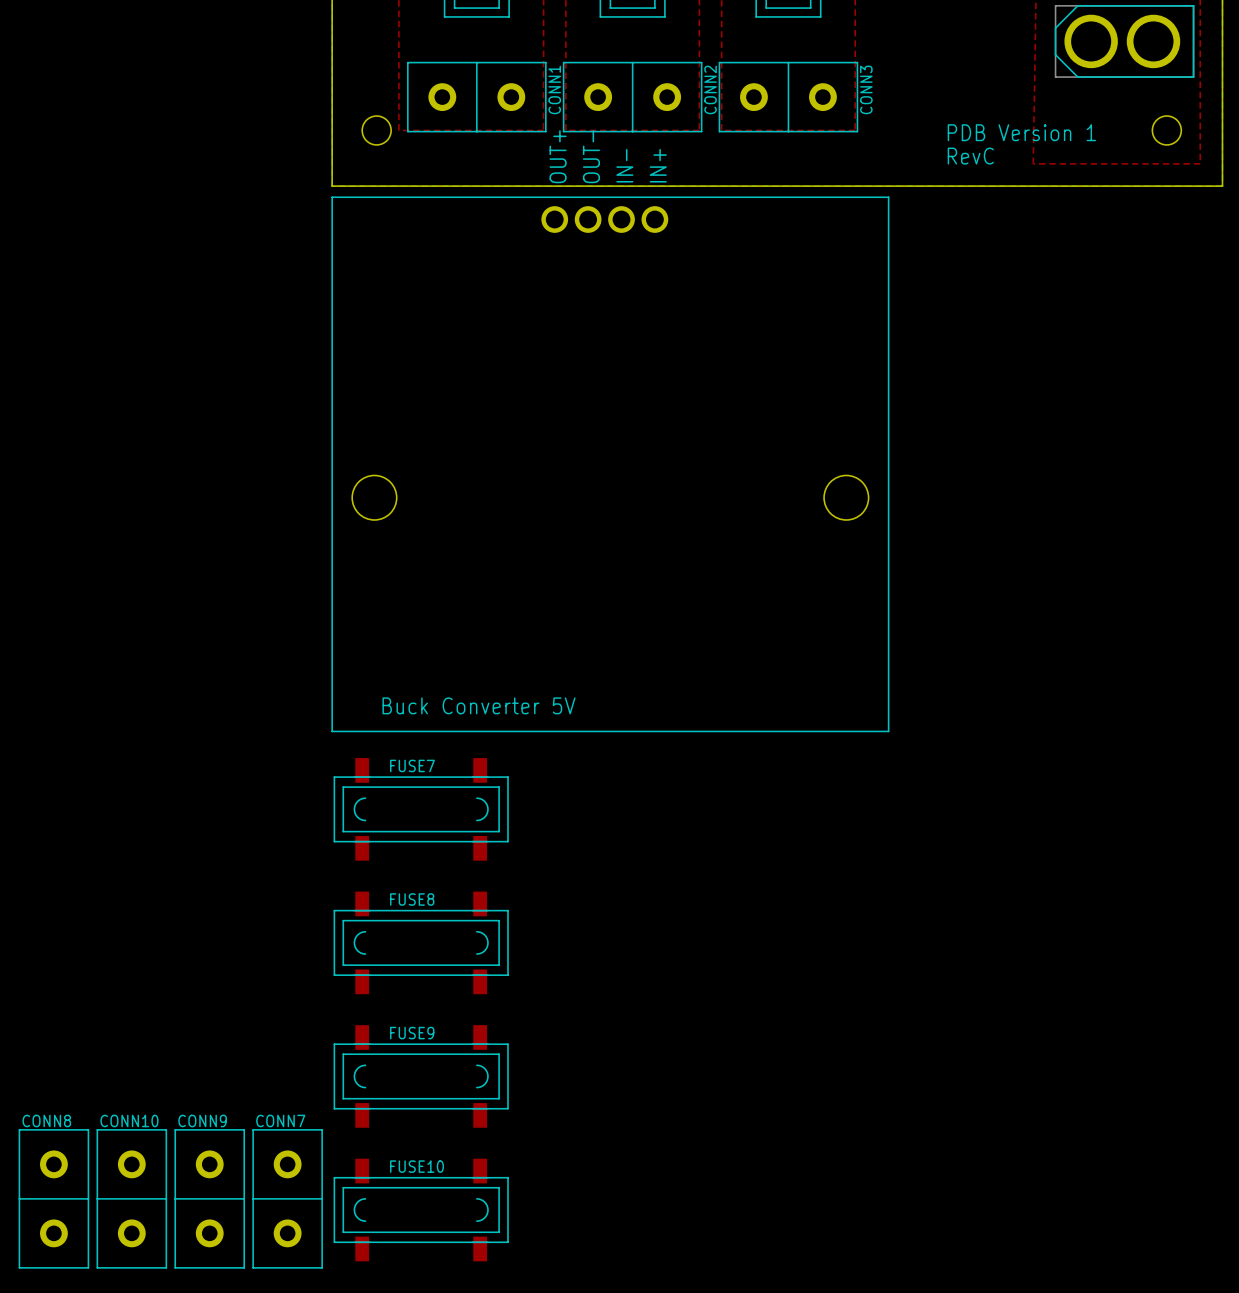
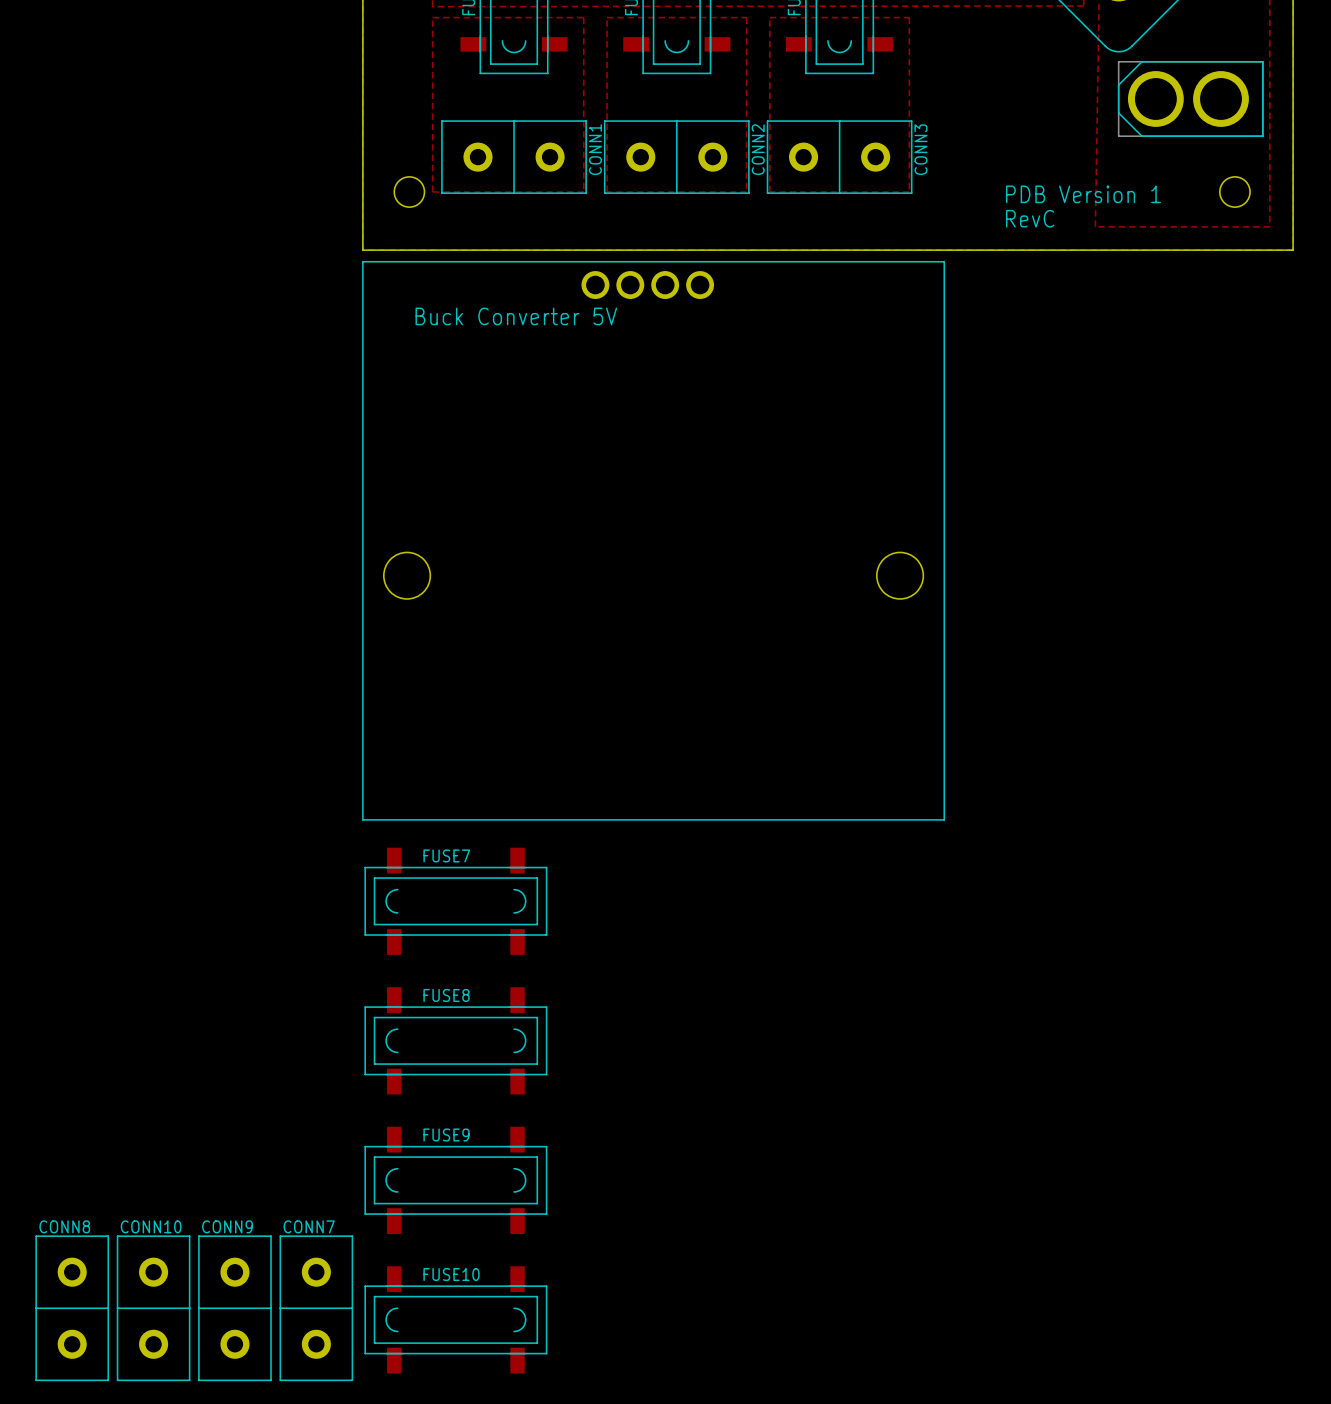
part text: OUT+ (558, 156) -> none
part text: OUT- (591, 156) -> none
part text: IN- (624, 165) -> none
part text: IN+ (658, 165) -> none
part text position: Buck Converter 5V (479, 705) -> Buck Converter 5V (516, 316)

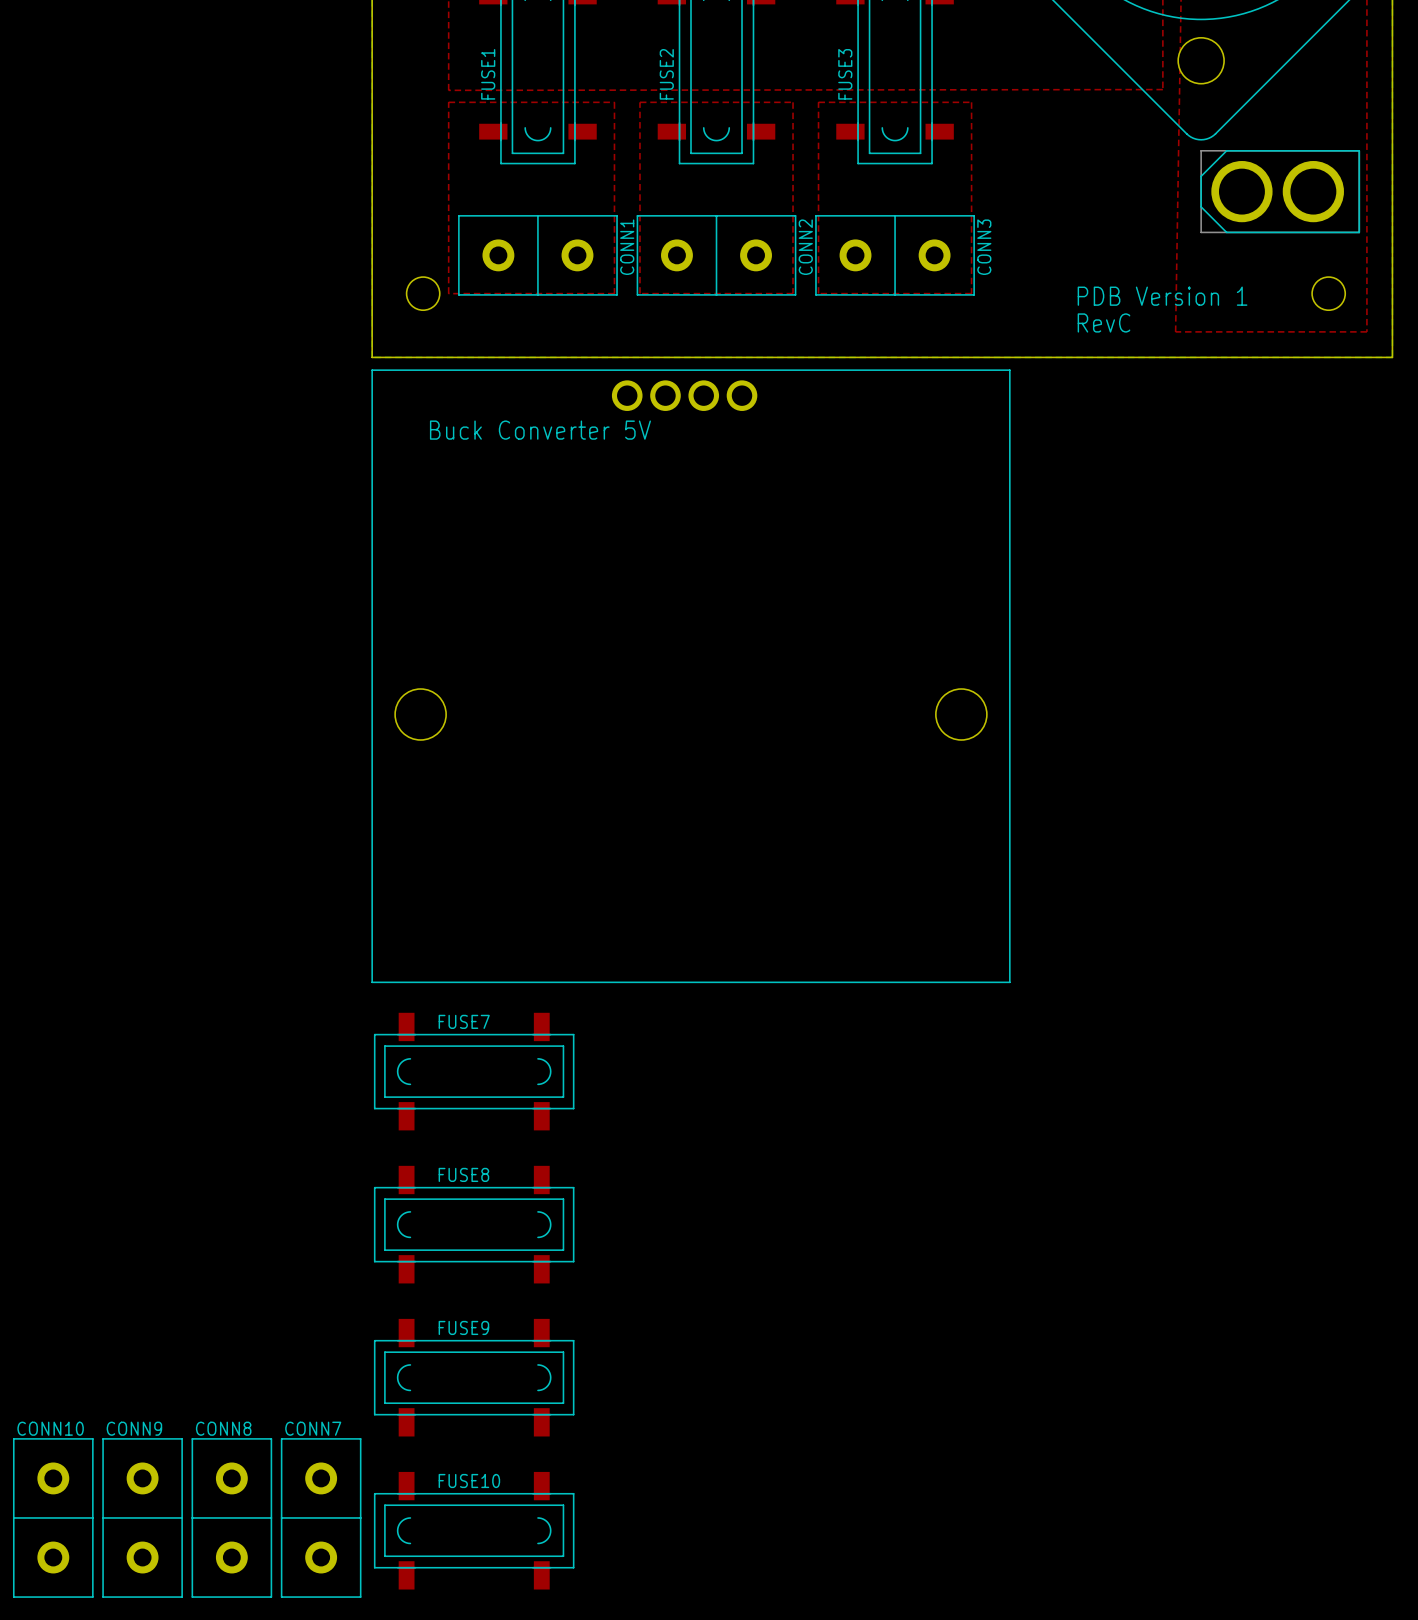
CONN8 name: CONN8 (64, 1226) -> CONN10 (50, 1428)
CONN10 name: CONN10 (151, 1226) -> CONN9 (134, 1428)
CONN9 name: CONN9 (227, 1226) -> CONN8 (223, 1428)

